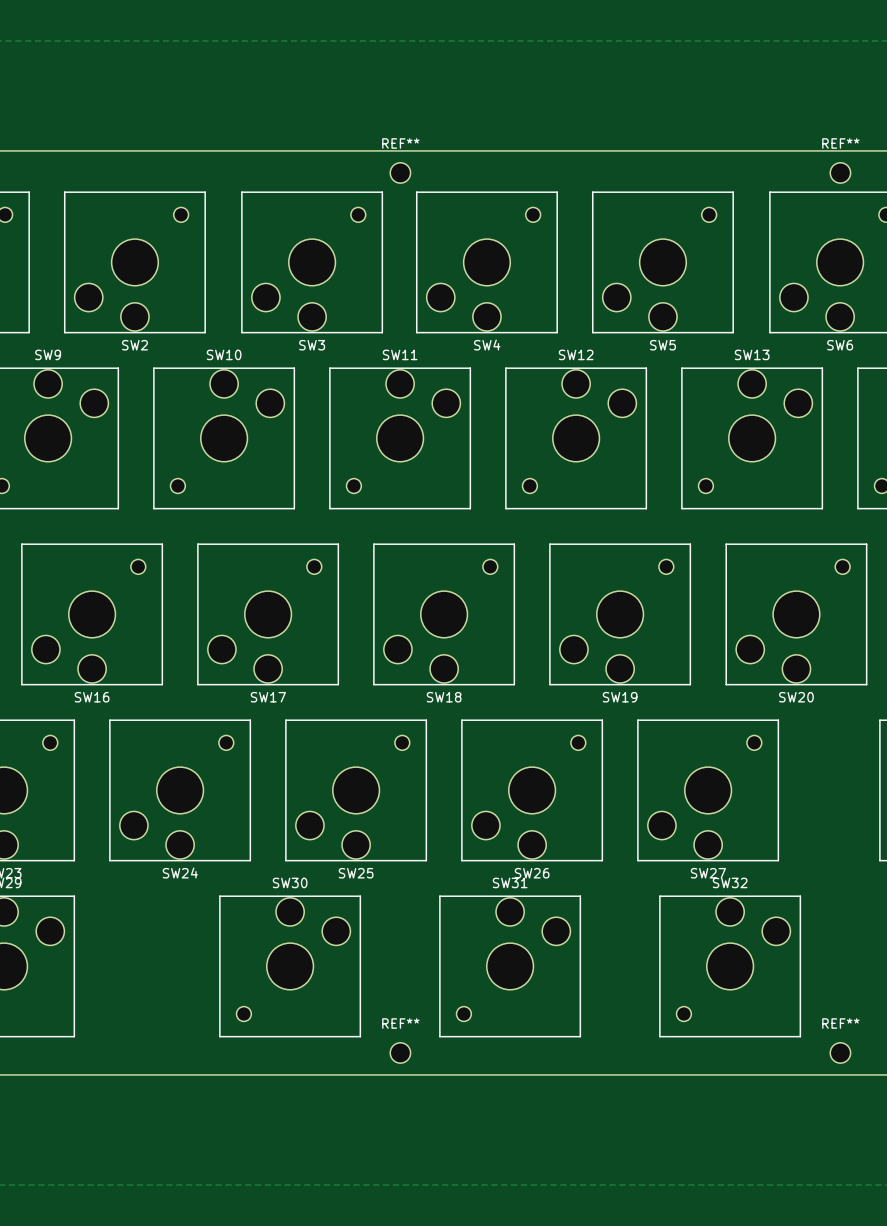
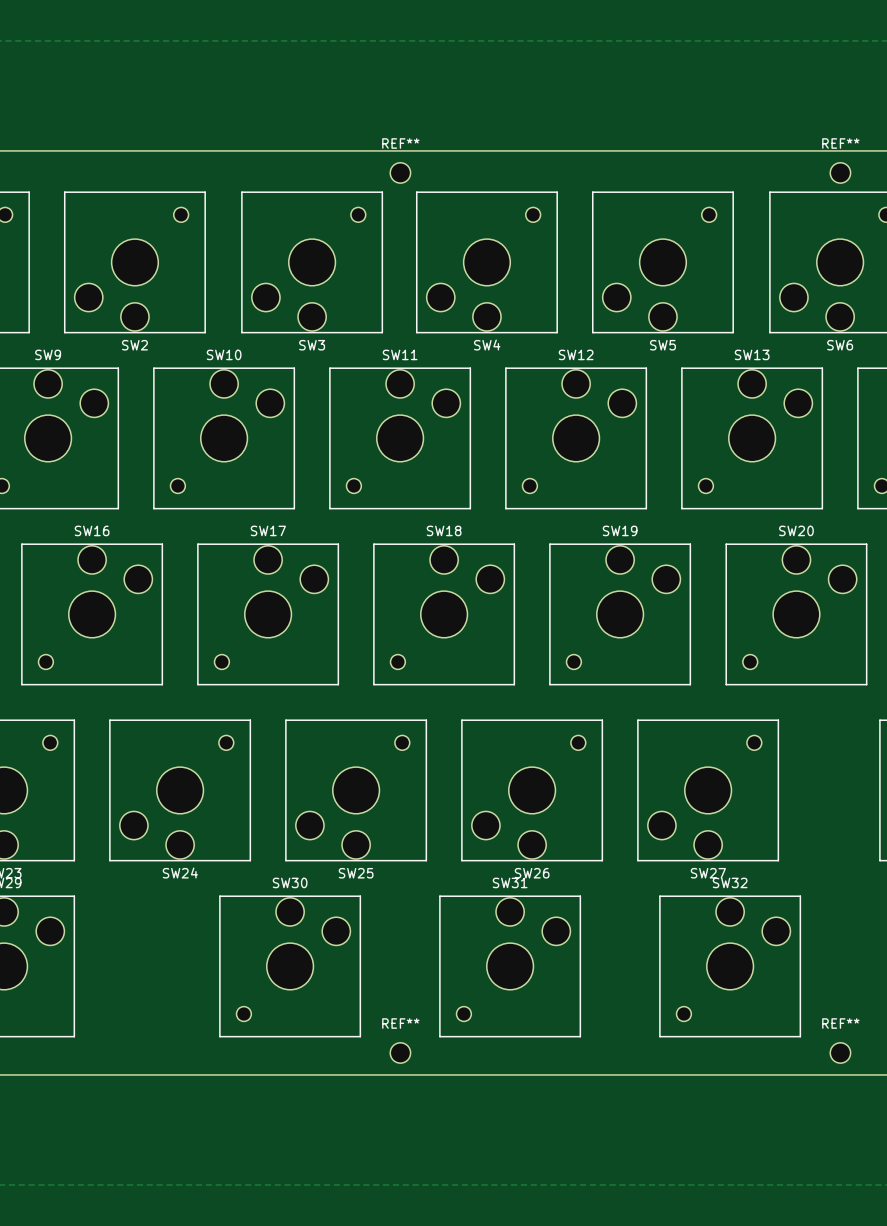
SW16 rotation: 0° (92, 614) -> 180° (92, 614)
SW17 rotation: 0° (268, 614) -> 180° (268, 614)
SW18 rotation: 0° (444, 614) -> 180° (444, 614)
SW19 rotation: 0° (620, 614) -> 180° (620, 614)
SW20 rotation: 0° (796, 614) -> 180° (796, 614)

